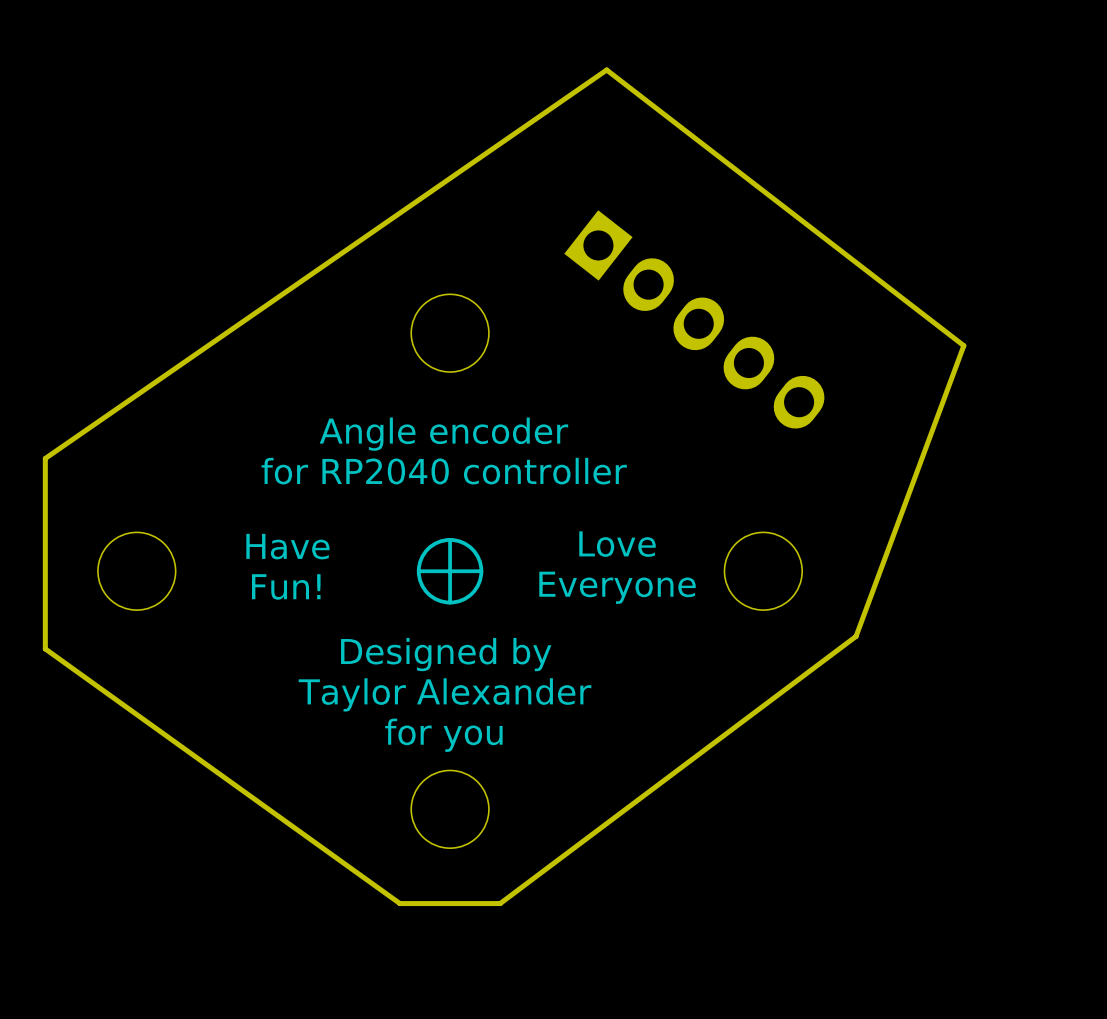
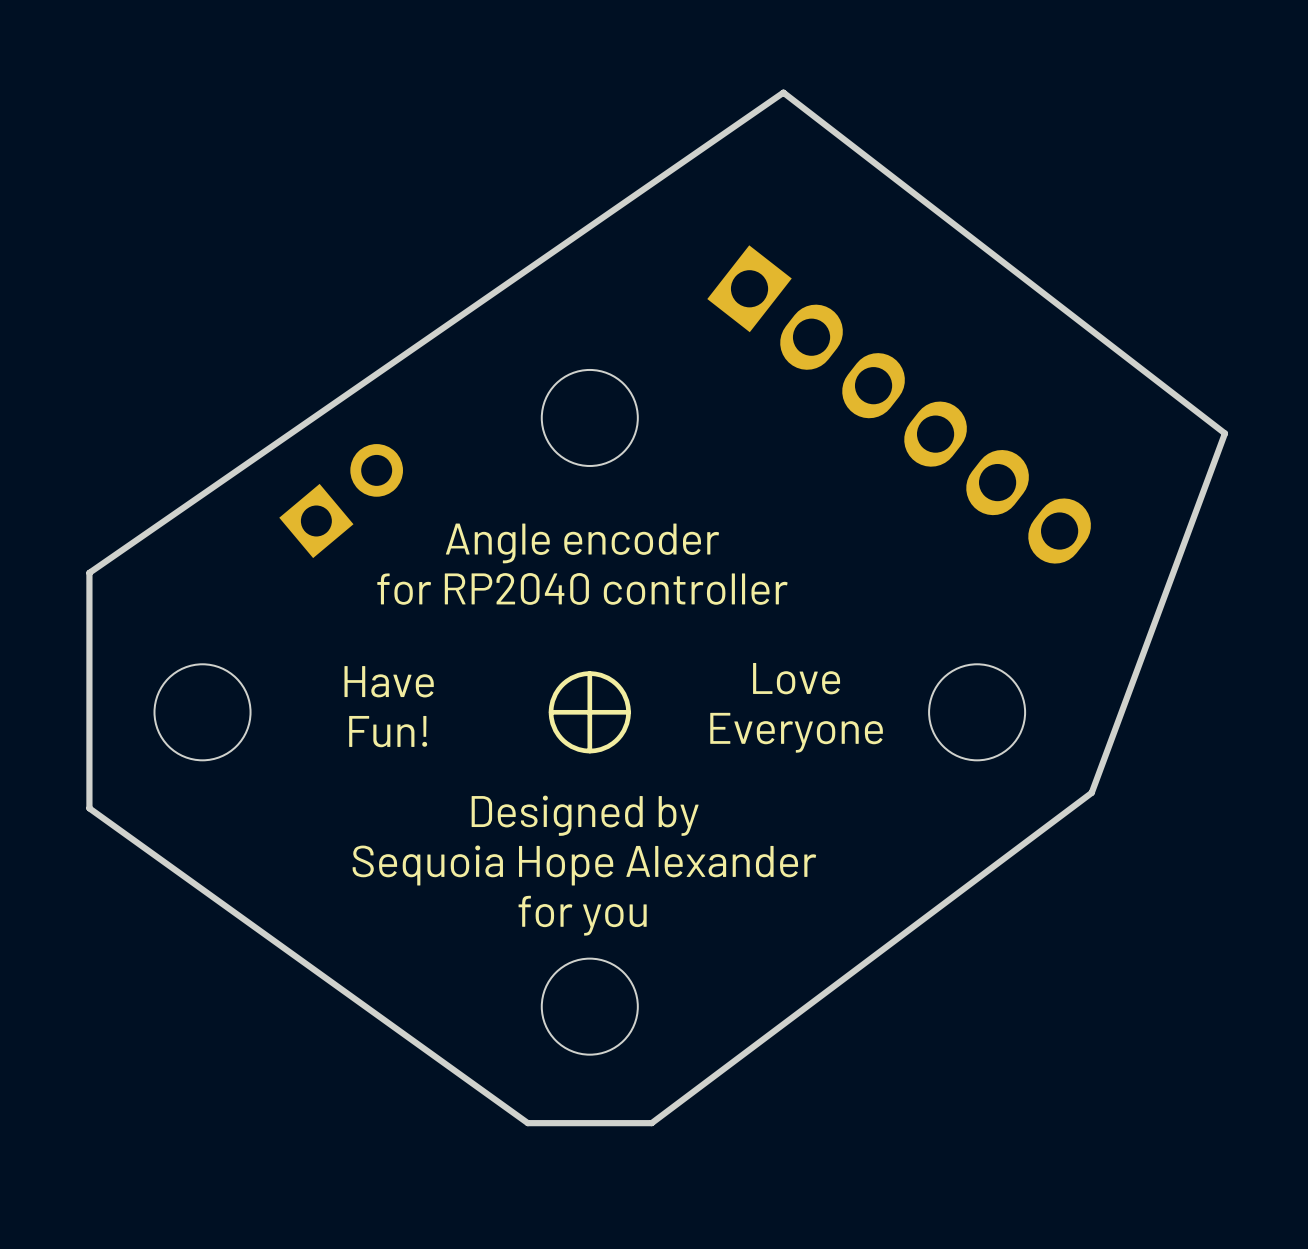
part footprint: [564, 210, 825, 429] -> [707, 245, 1091, 564]
part: none -> (341, 501)
text: Taylor Alexander (445, 694) -> Sequoia Hope Alexander (584, 865)

